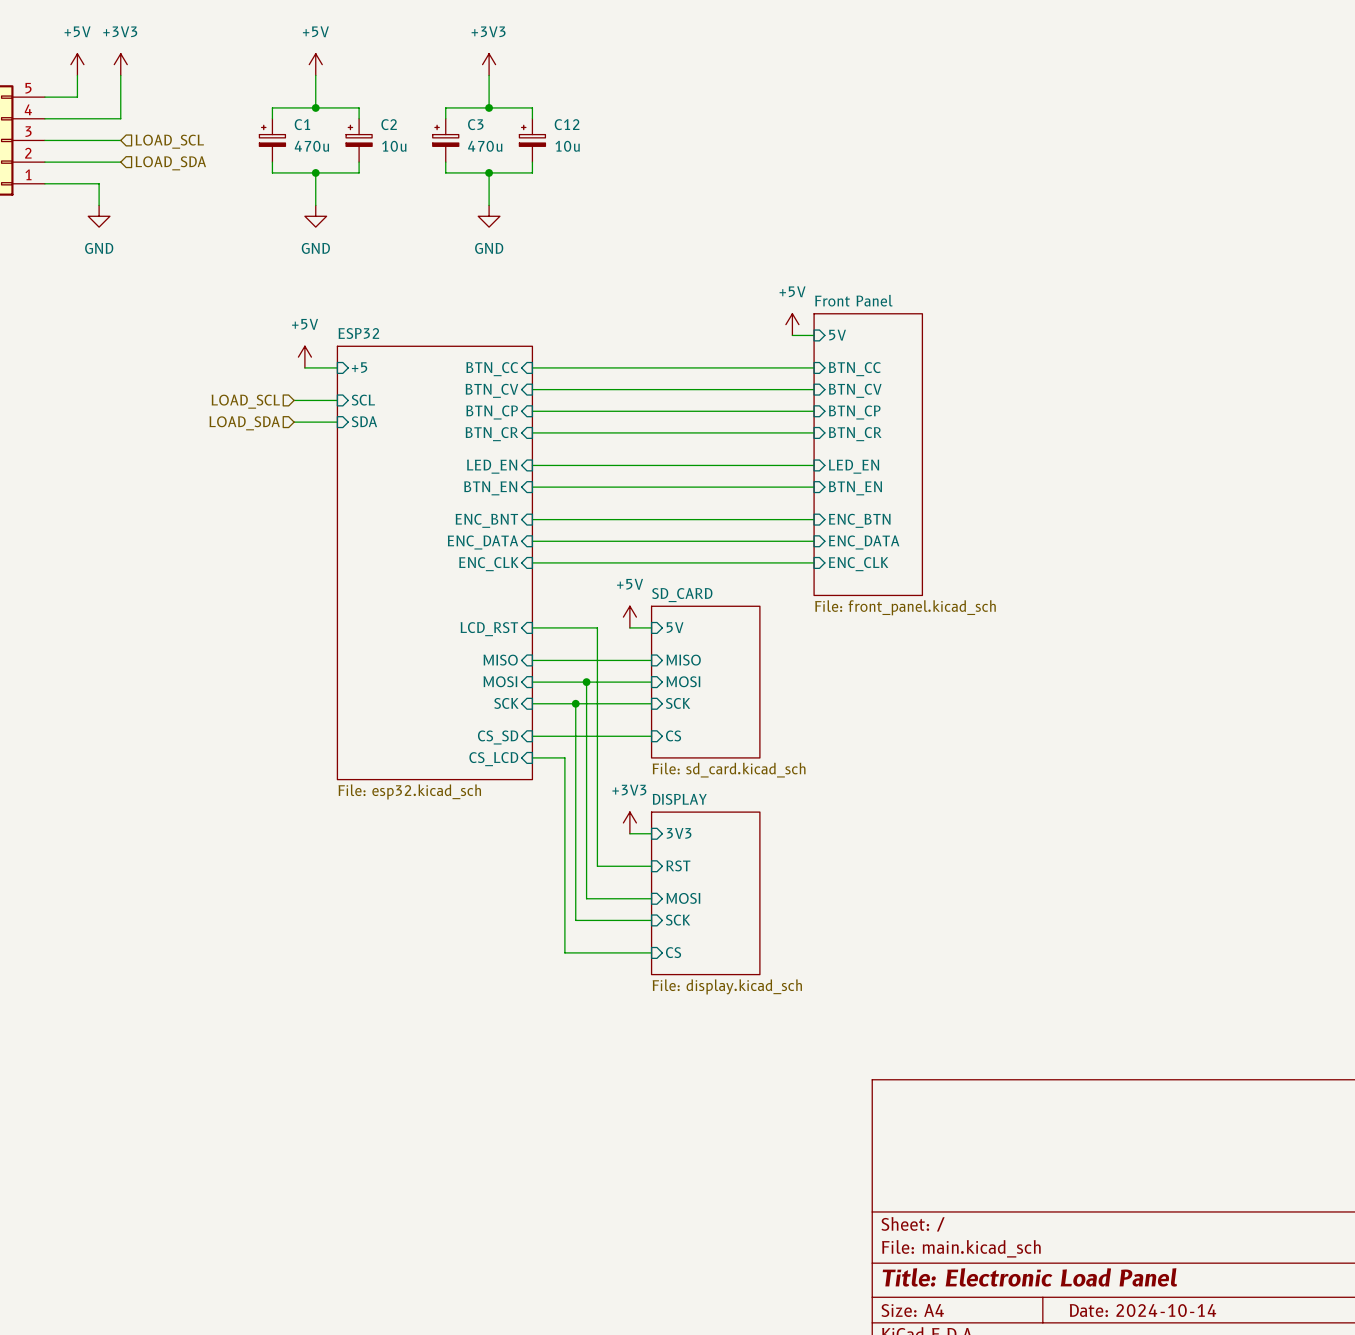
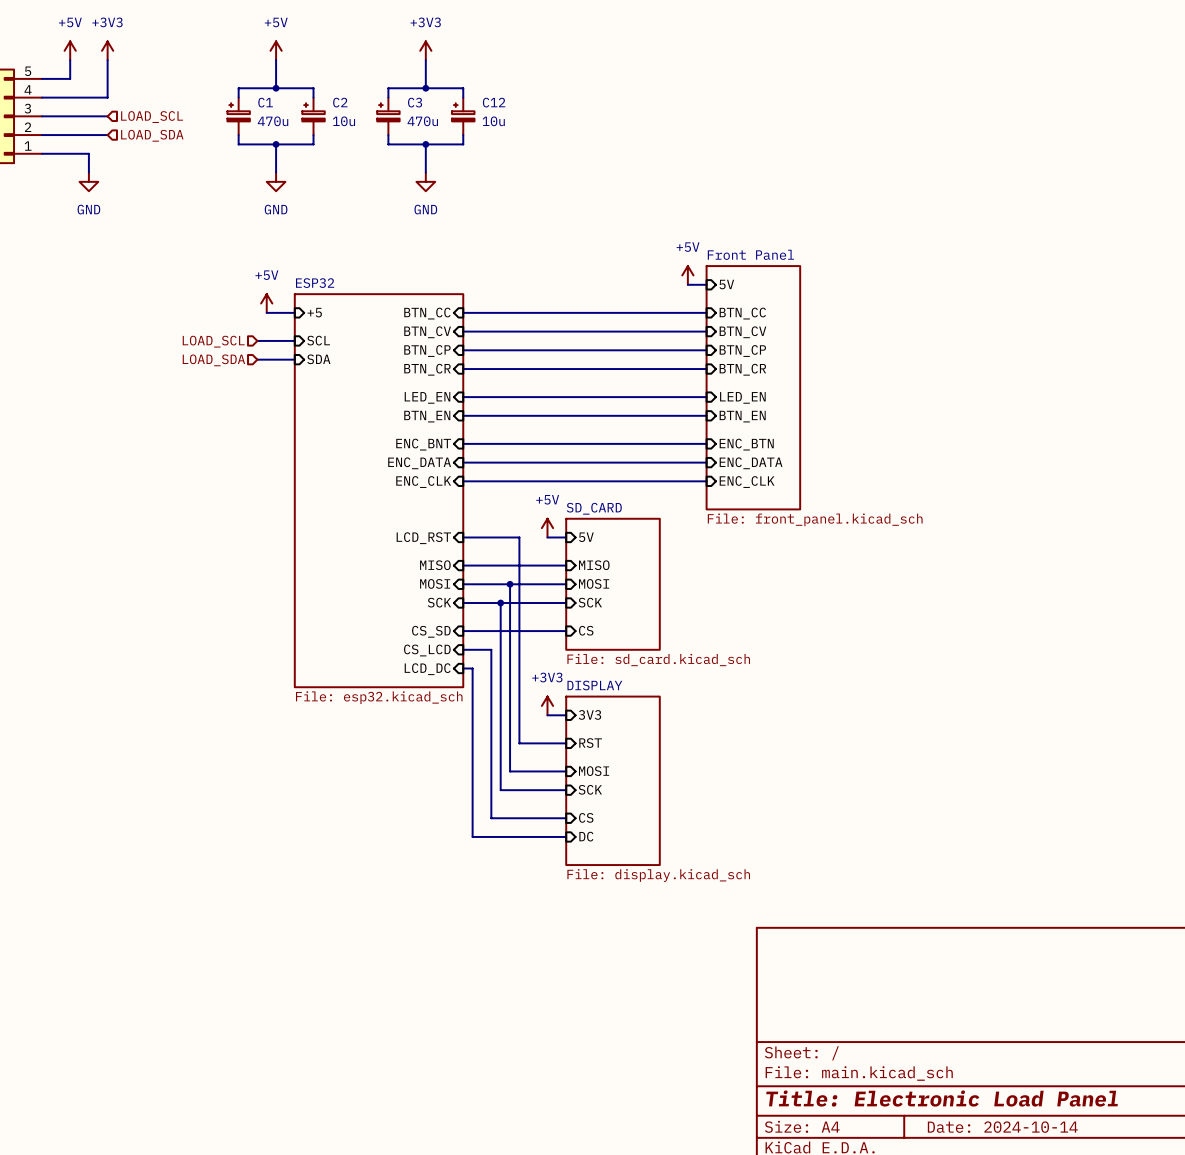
sheet ESP32 shape: [336, 345, 534, 781] -> [294, 293, 464, 688]
wire: none -> (463, 668) (472, 668) (472, 836) (566, 836)
sheet pin: none -> LCD_DC (427, 669)
sheet DISPLAY: File: display.kicad_sch (705, 893) -> none
sheet DISPLAY: none -> File: display.kicad_sch (613, 780)
sheet pin: none -> DC (586, 836)

